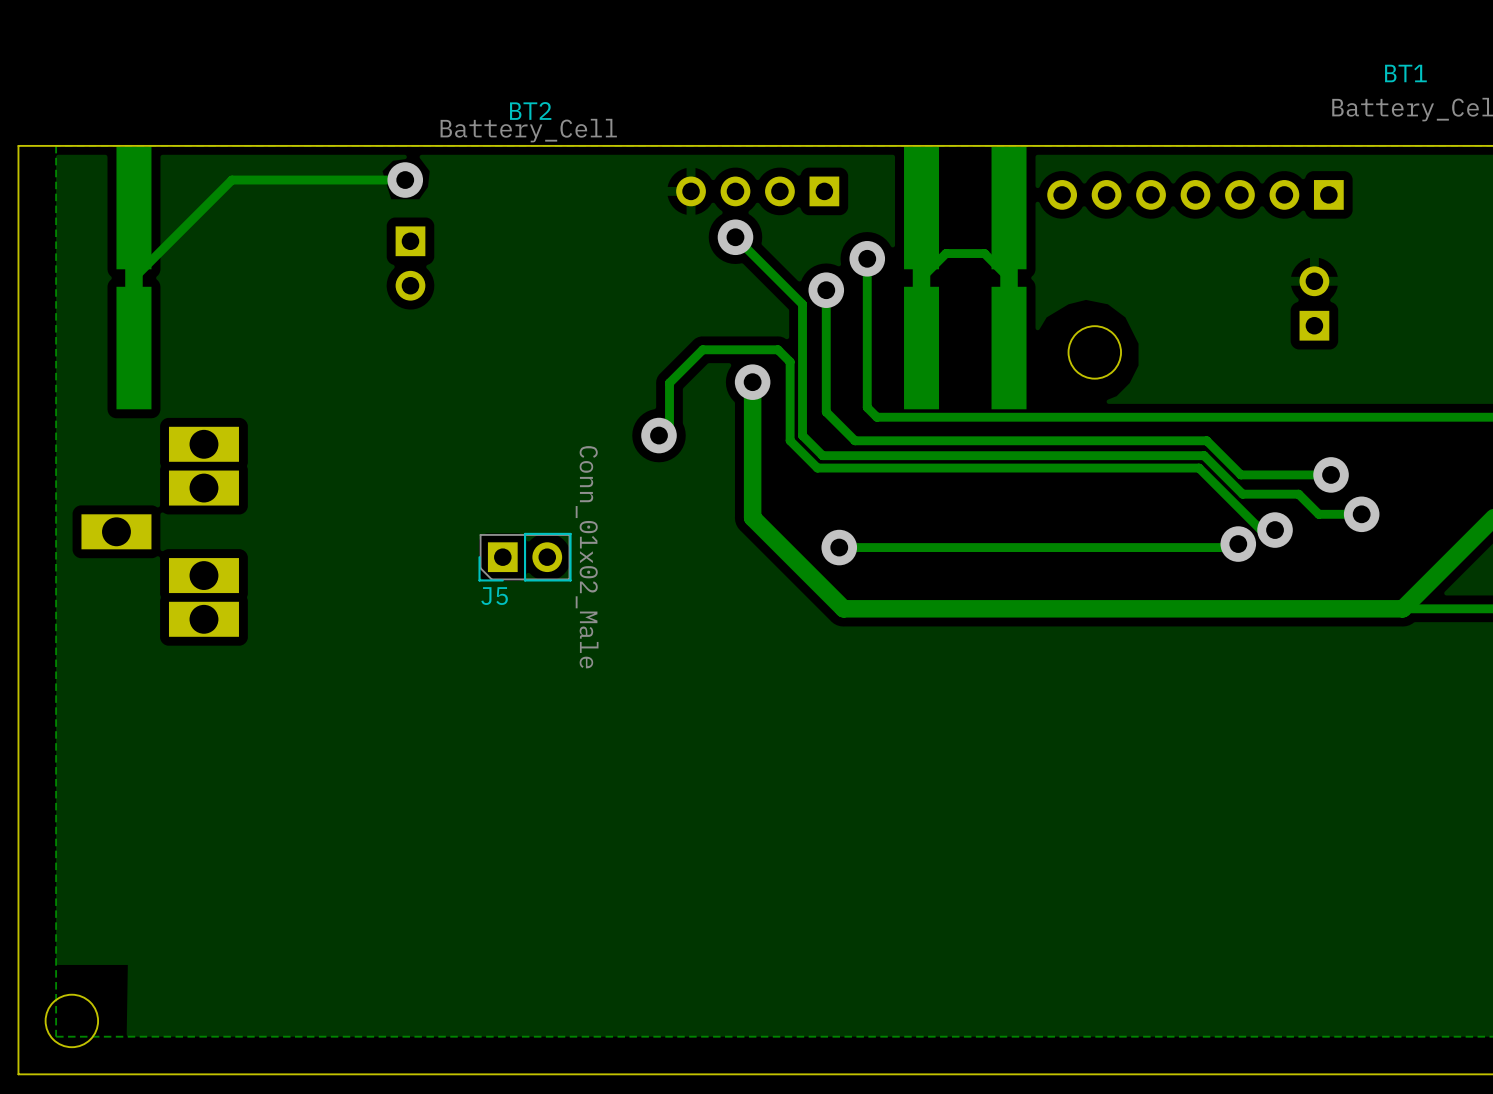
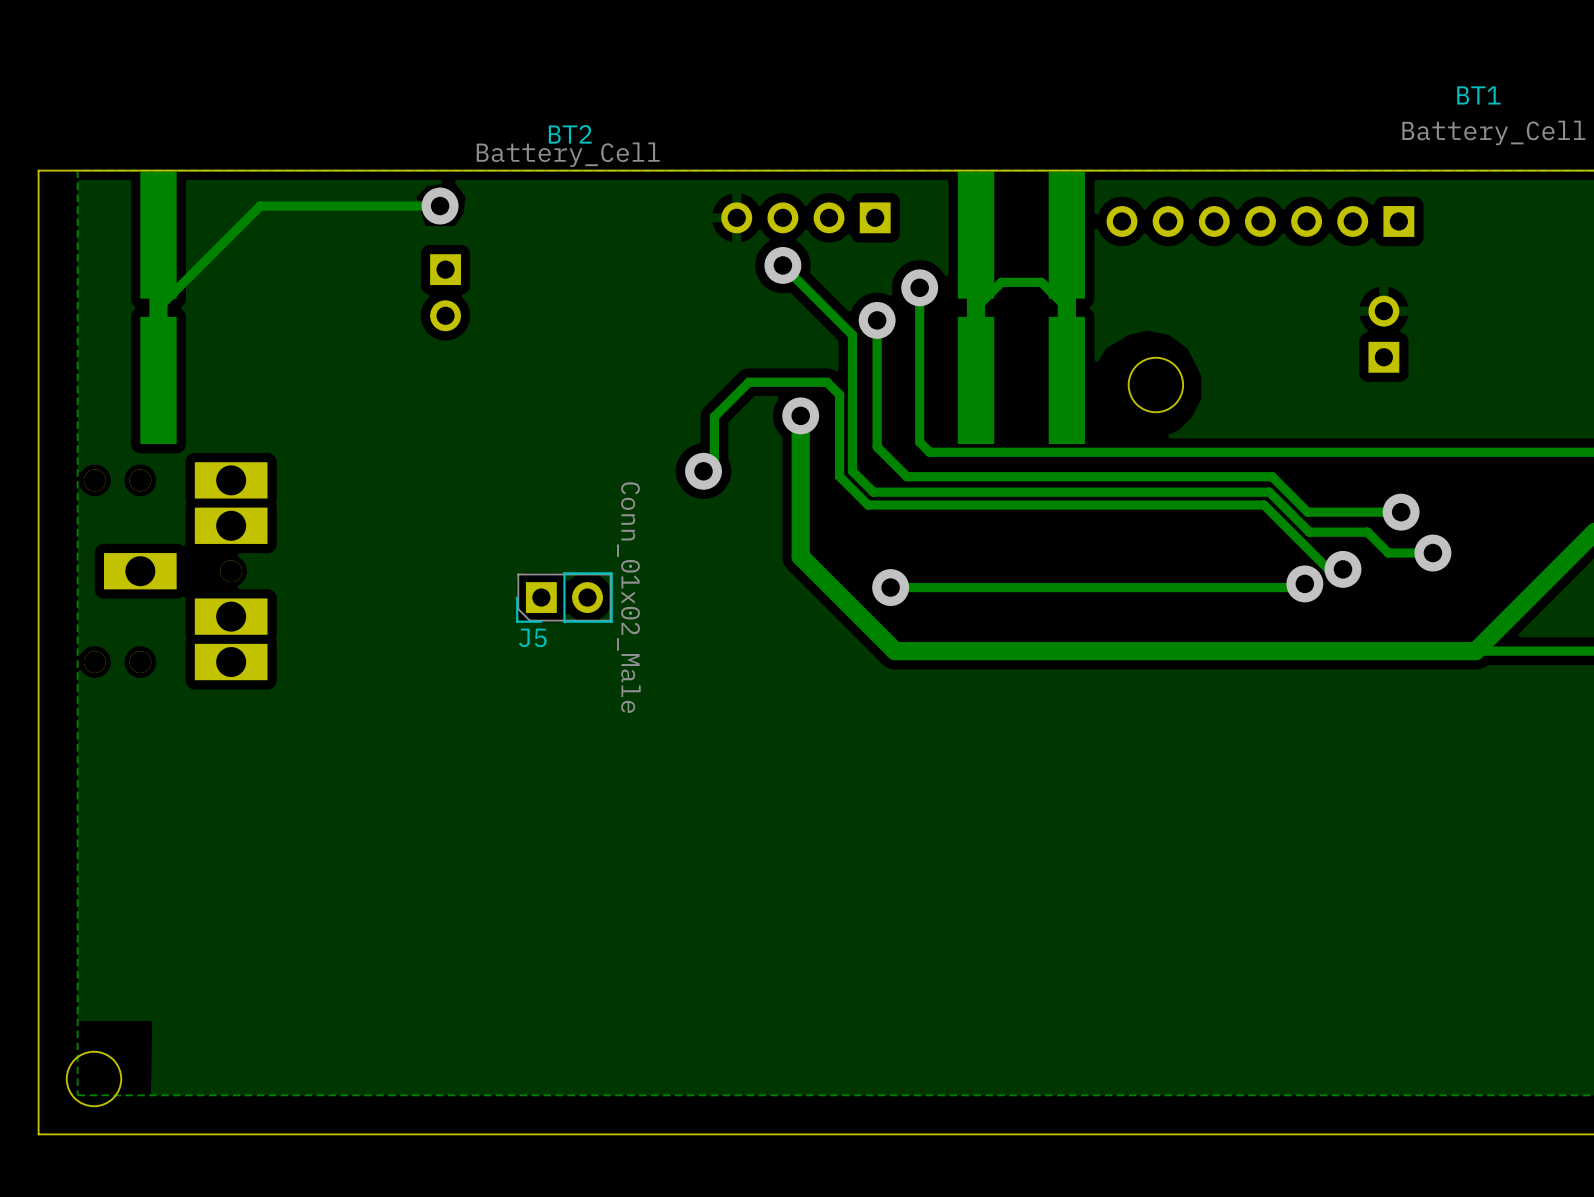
part footprint: [81, 426, 239, 637] -> [84, 462, 268, 681]

